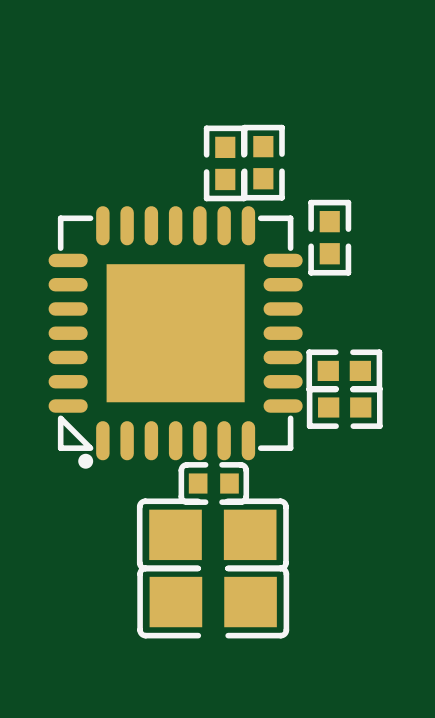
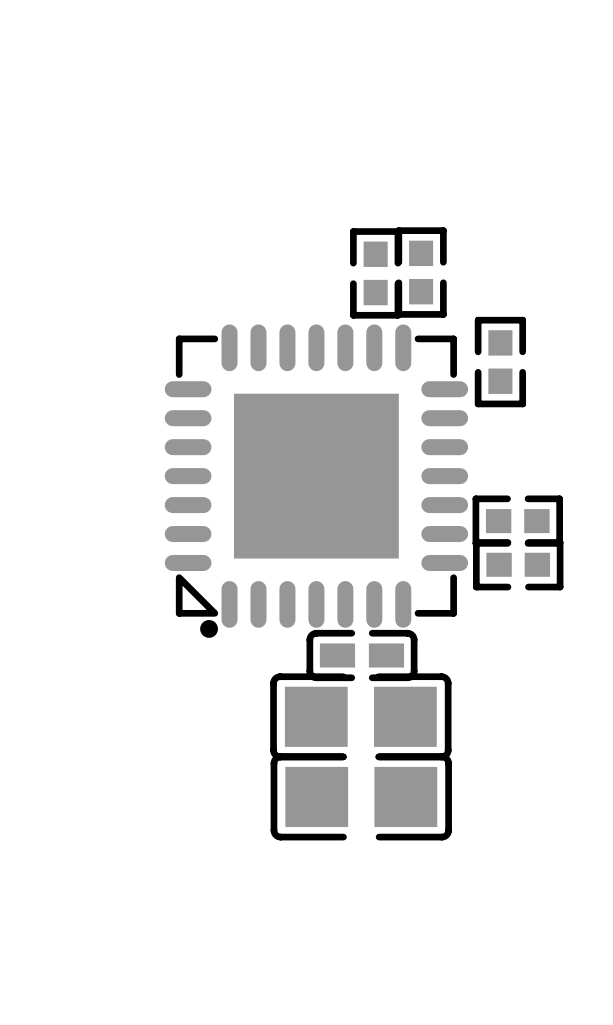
part footprint: [178, 462, 250, 505] -> [306, 629, 418, 682]

